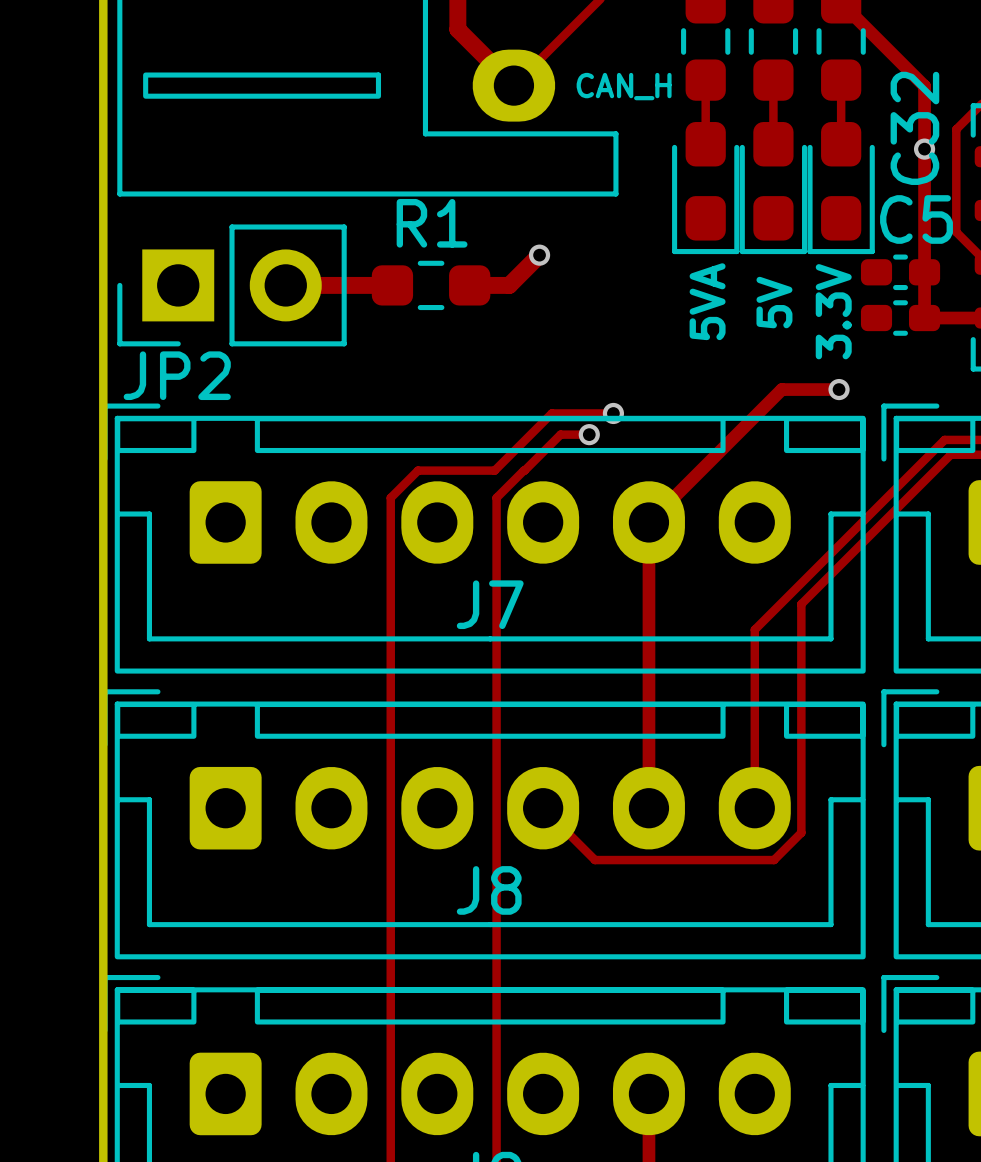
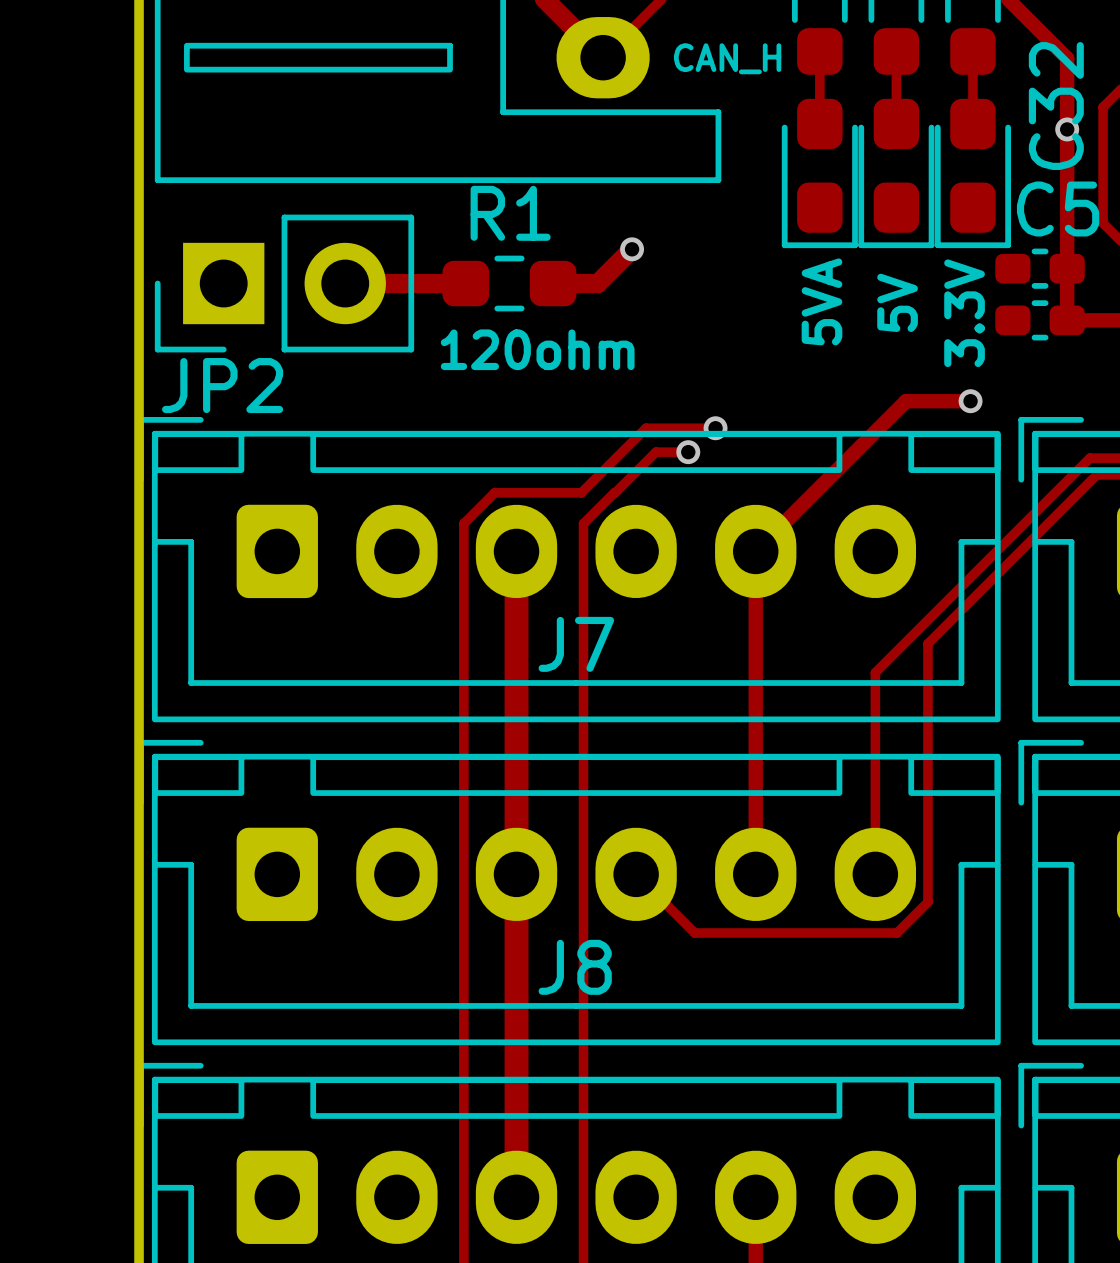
text: none -> 120ohm (537, 349)
track: none -> (516, 551) (516, 1197)

